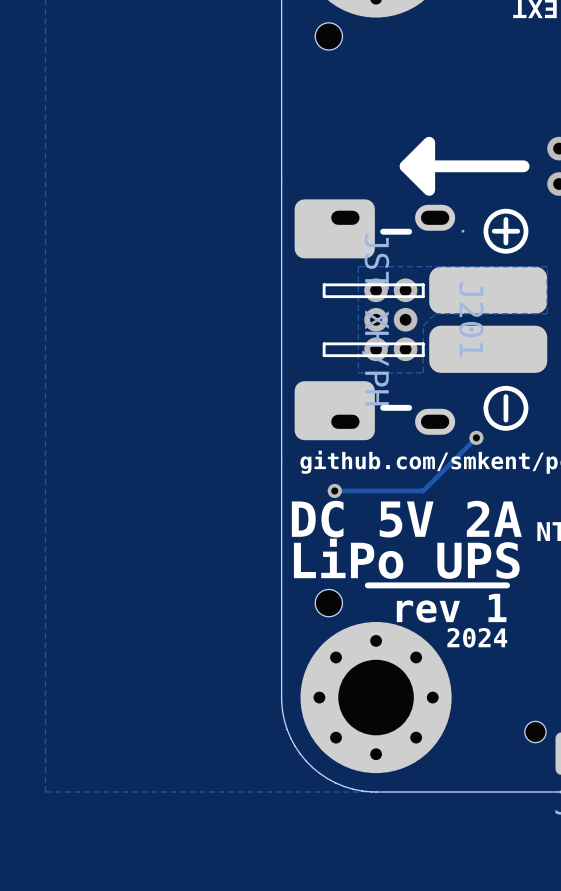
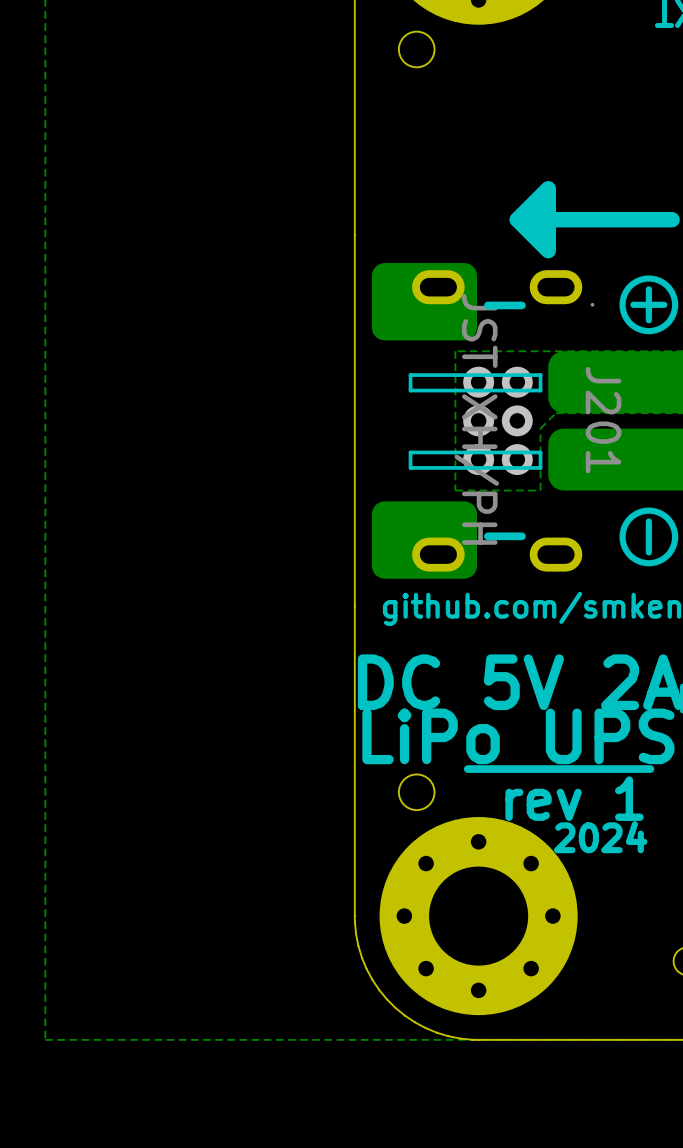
track: (476, 437) (423, 490) (334, 490) -> none
via: (476, 437) -> none
via: (334, 490) -> none

